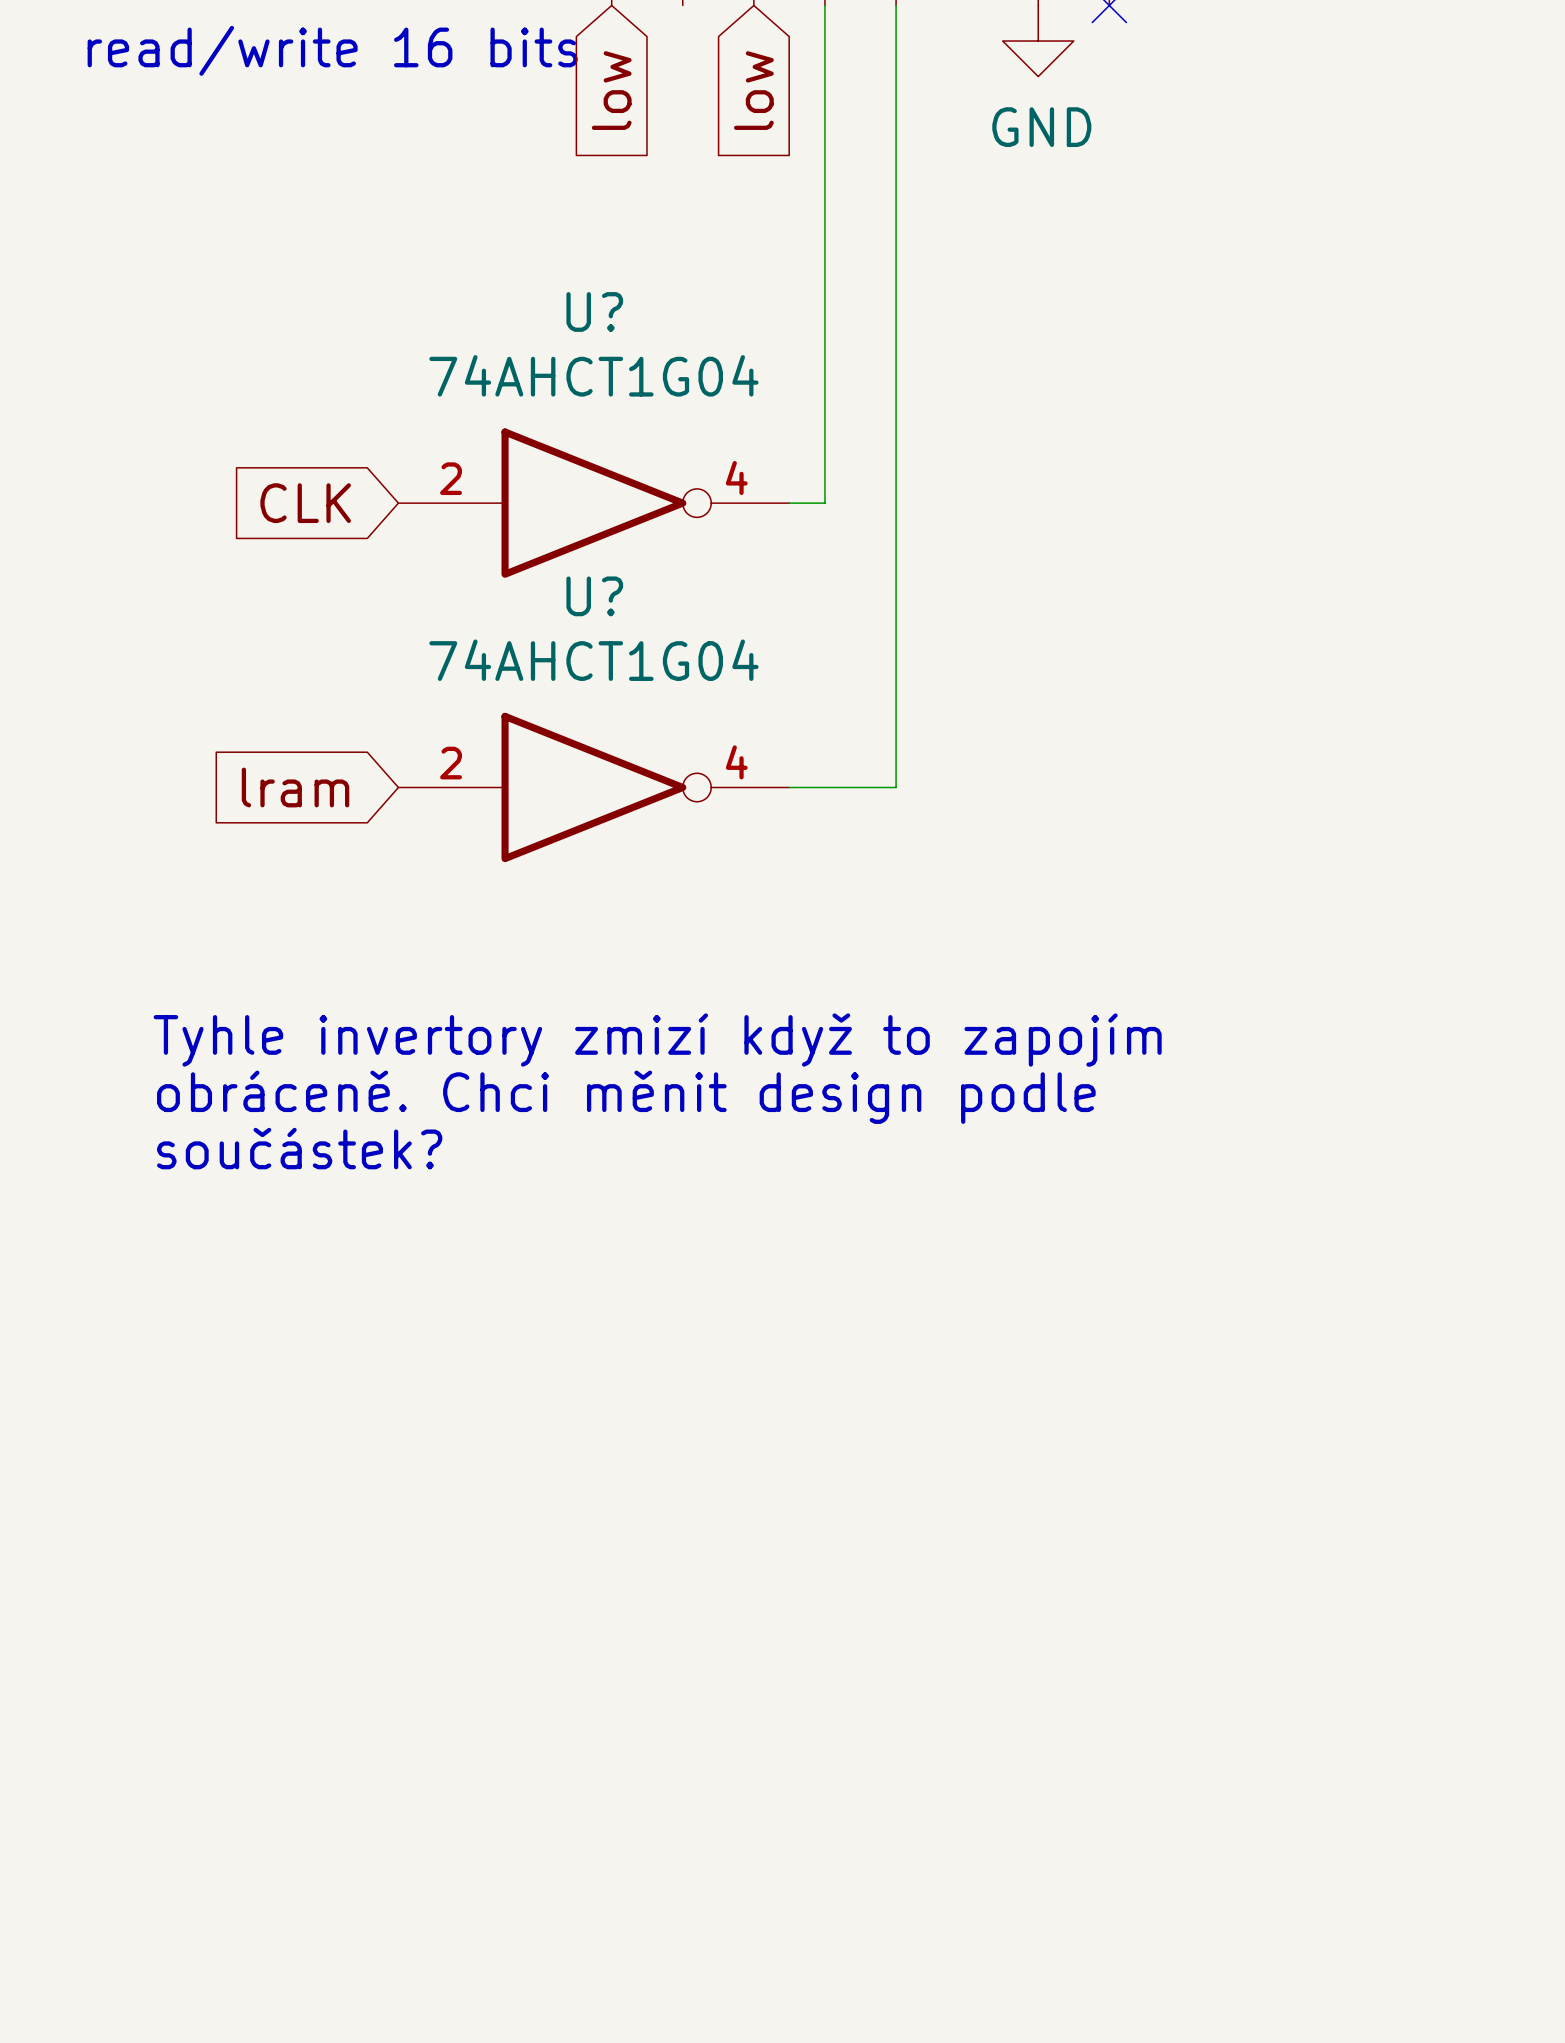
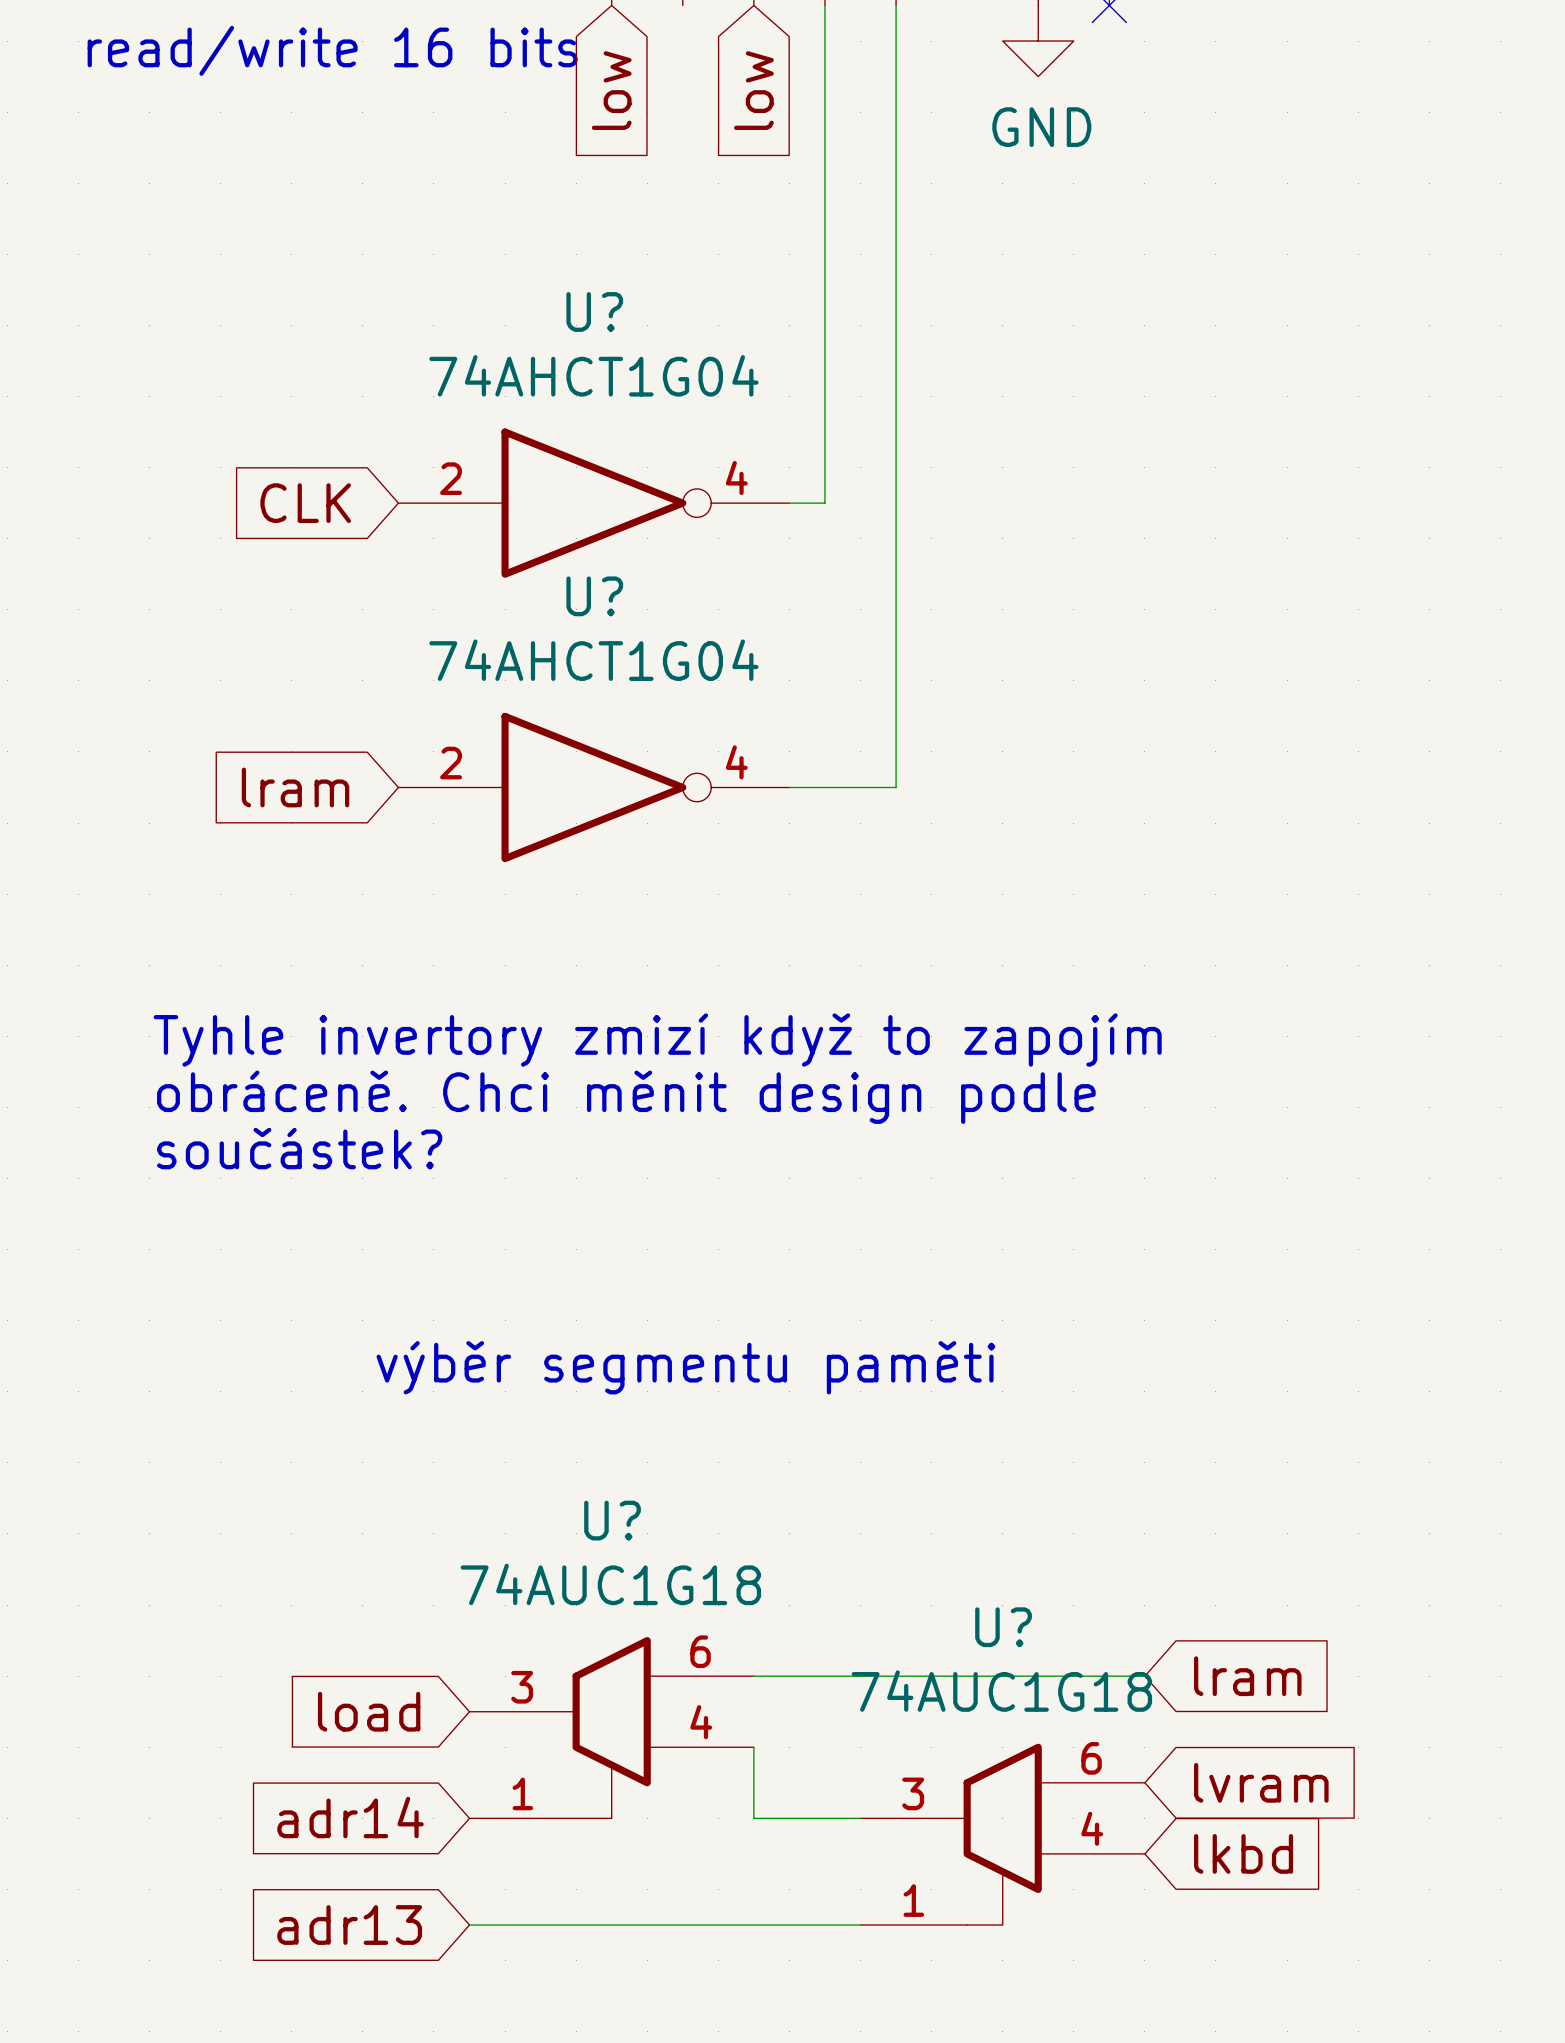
text: none -> výběr segmentu paměti (685, 1367)
wire: none -> (753, 1676) (1144, 1676)
global label: none -> lram (1247, 1676)
global label: none -> load (369, 1711)
U?: none -> 74AUC1G18 (611, 1727)
wire: none -> (753, 1747) (753, 1818) (860, 1818)
global label: none -> lvram (1261, 1782)
global label: none -> adr14 (350, 1817)
U?: none -> 74AUC1G18 (1002, 1834)
global label: none -> lkbd (1243, 1853)
global label: none -> adr13 (349, 1925)
wire: none -> (469, 1925) (860, 1925)

